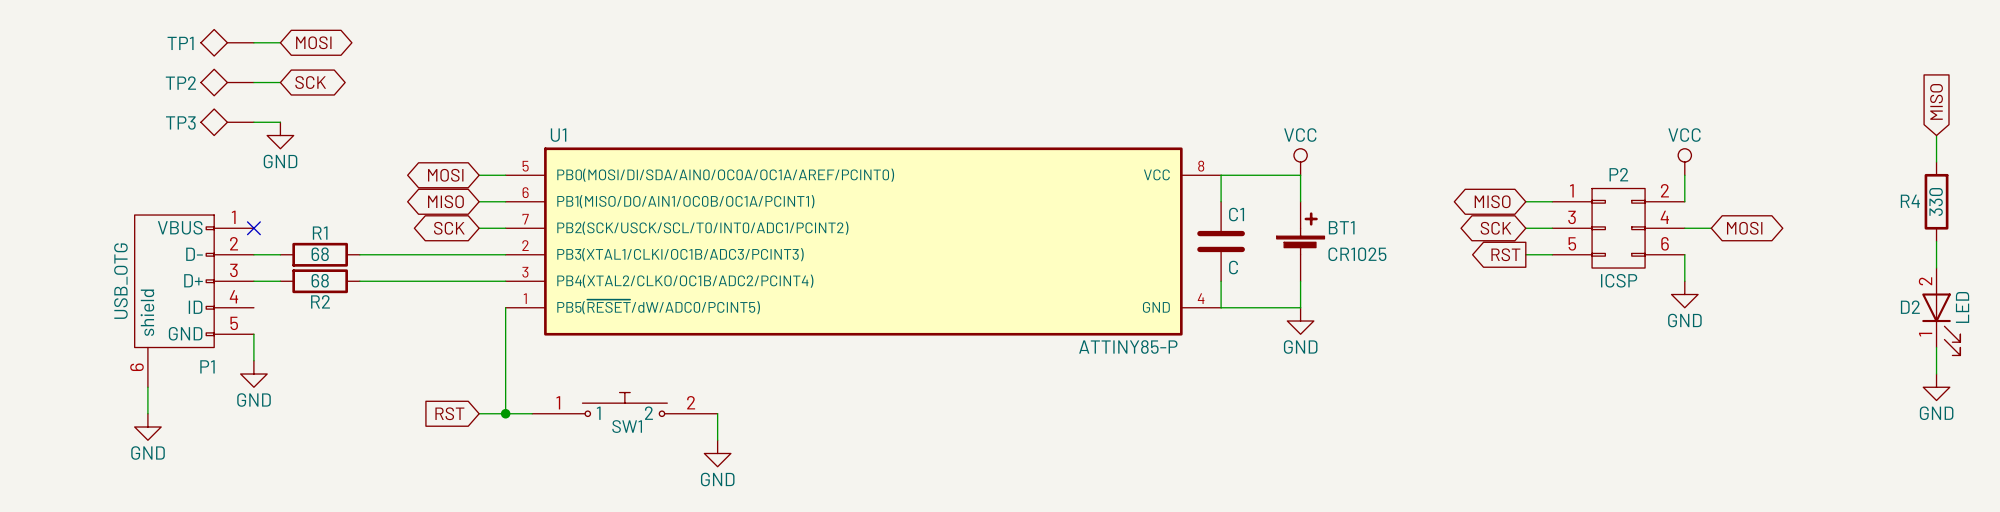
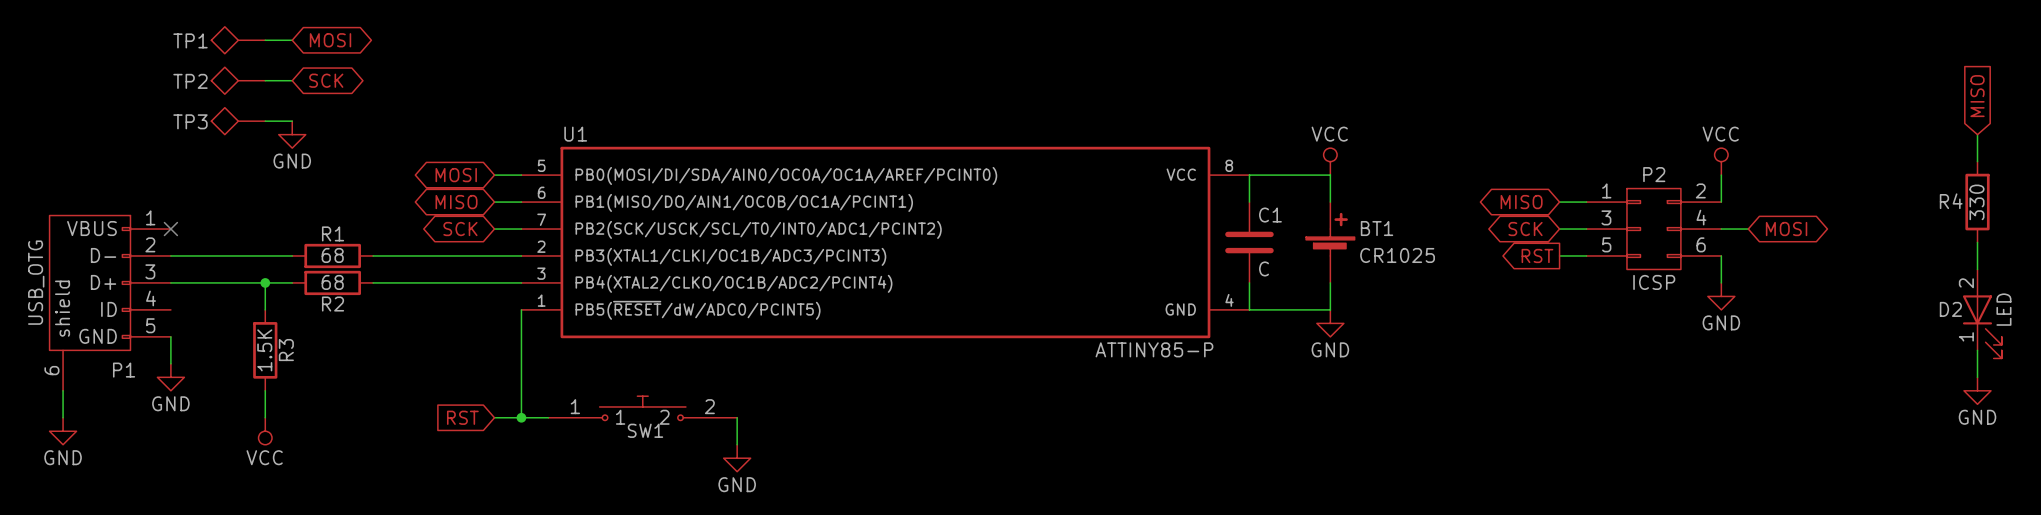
no-connect mark: none -> (170, 229)
no-connect mark: (253, 228) -> none
wire: none -> (170, 255) (265, 255)
wire: none -> (170, 282) (265, 282) (265, 309)
junction: none -> (265, 282)
P1 position: (194, 301) -> (110, 303)
wire: (253, 334) (253, 360) -> (170, 336) (170, 363)
R3: none -> 1.5K (265, 350)
power symbol: none -> GND (170, 377)
power symbol: GND (253, 374) -> none
wire: (147, 387) (147, 413) -> (63, 390) (63, 417)
wire: none -> (265, 390) (265, 417)
power symbol: none -> GND (63, 431)
power symbol: GND (147, 427) -> none
power symbol: none -> VCC (265, 431)

